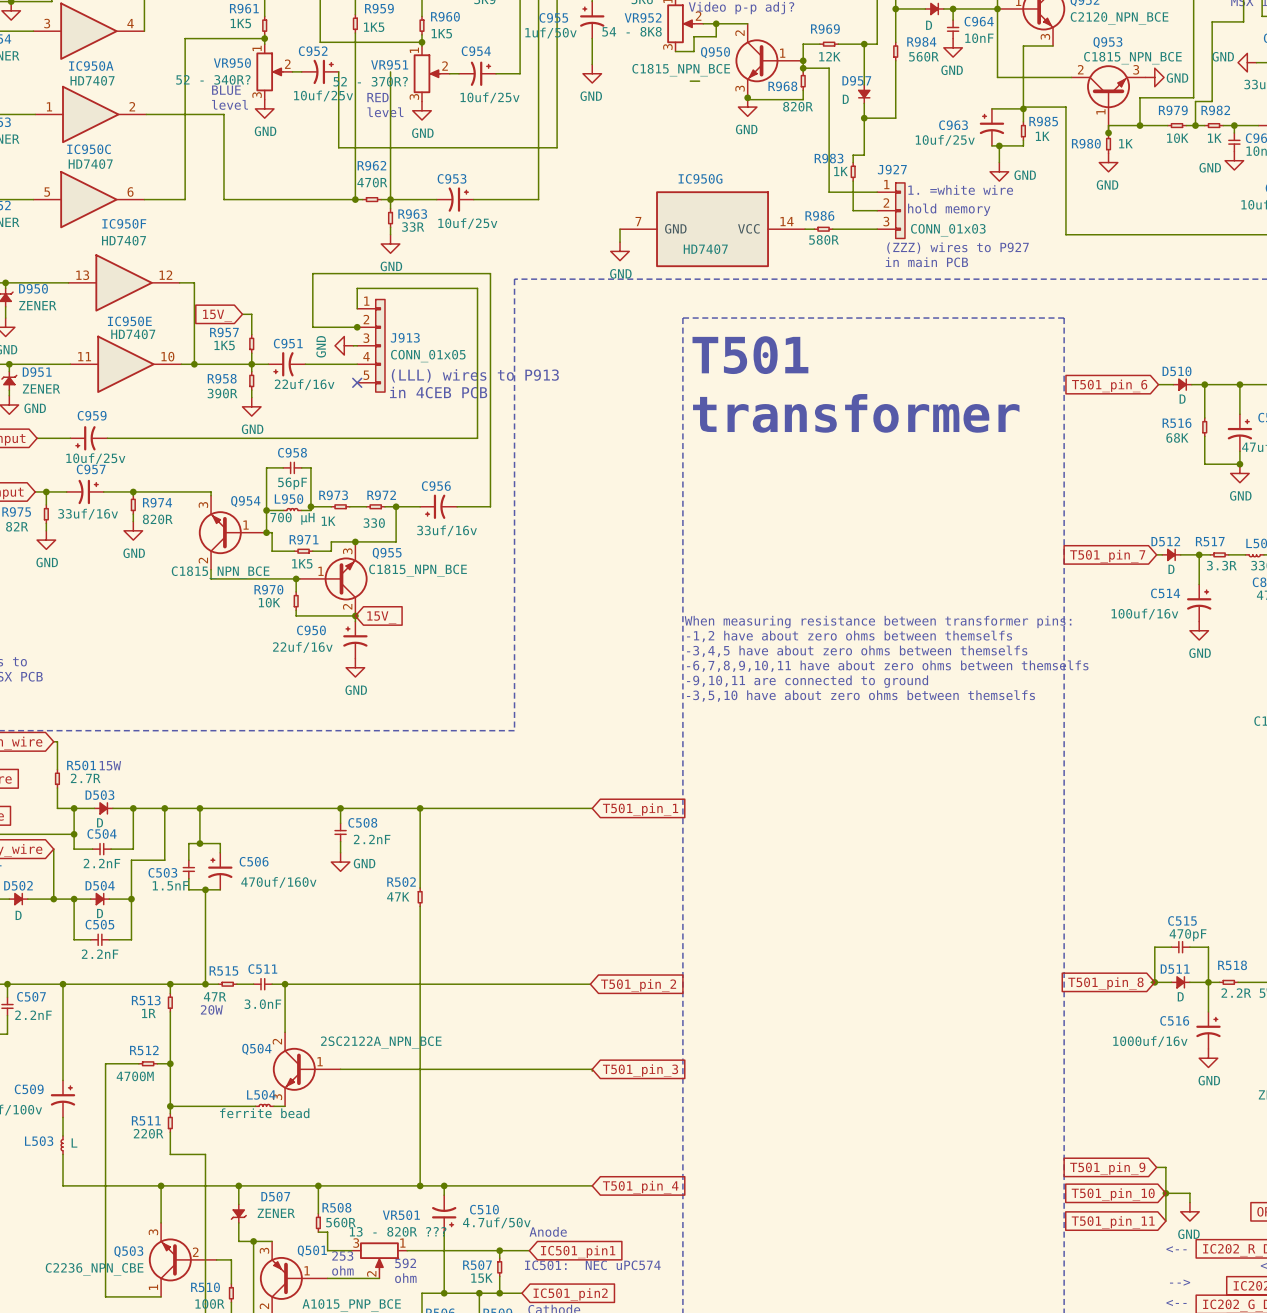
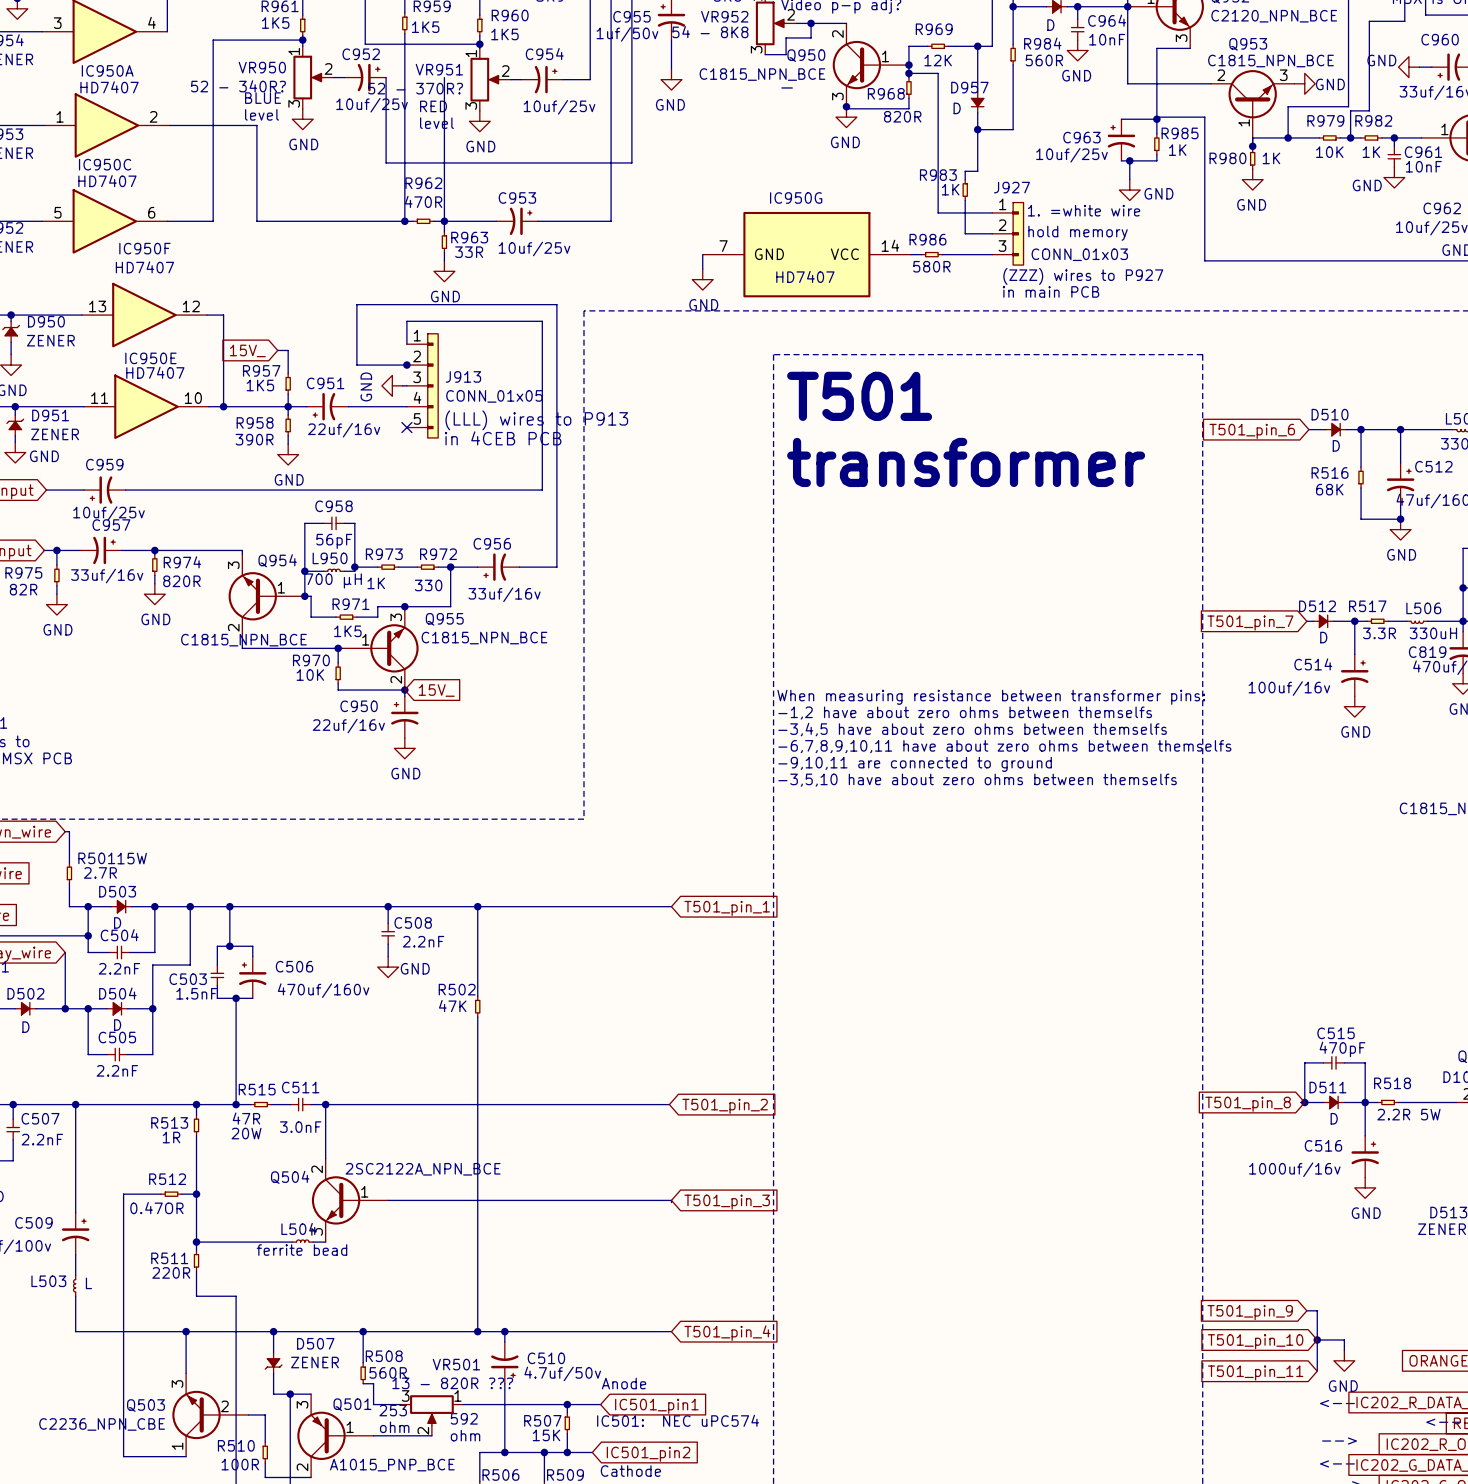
R512 value: 4700M (135, 1076) -> 0.47OR (156, 1208)

